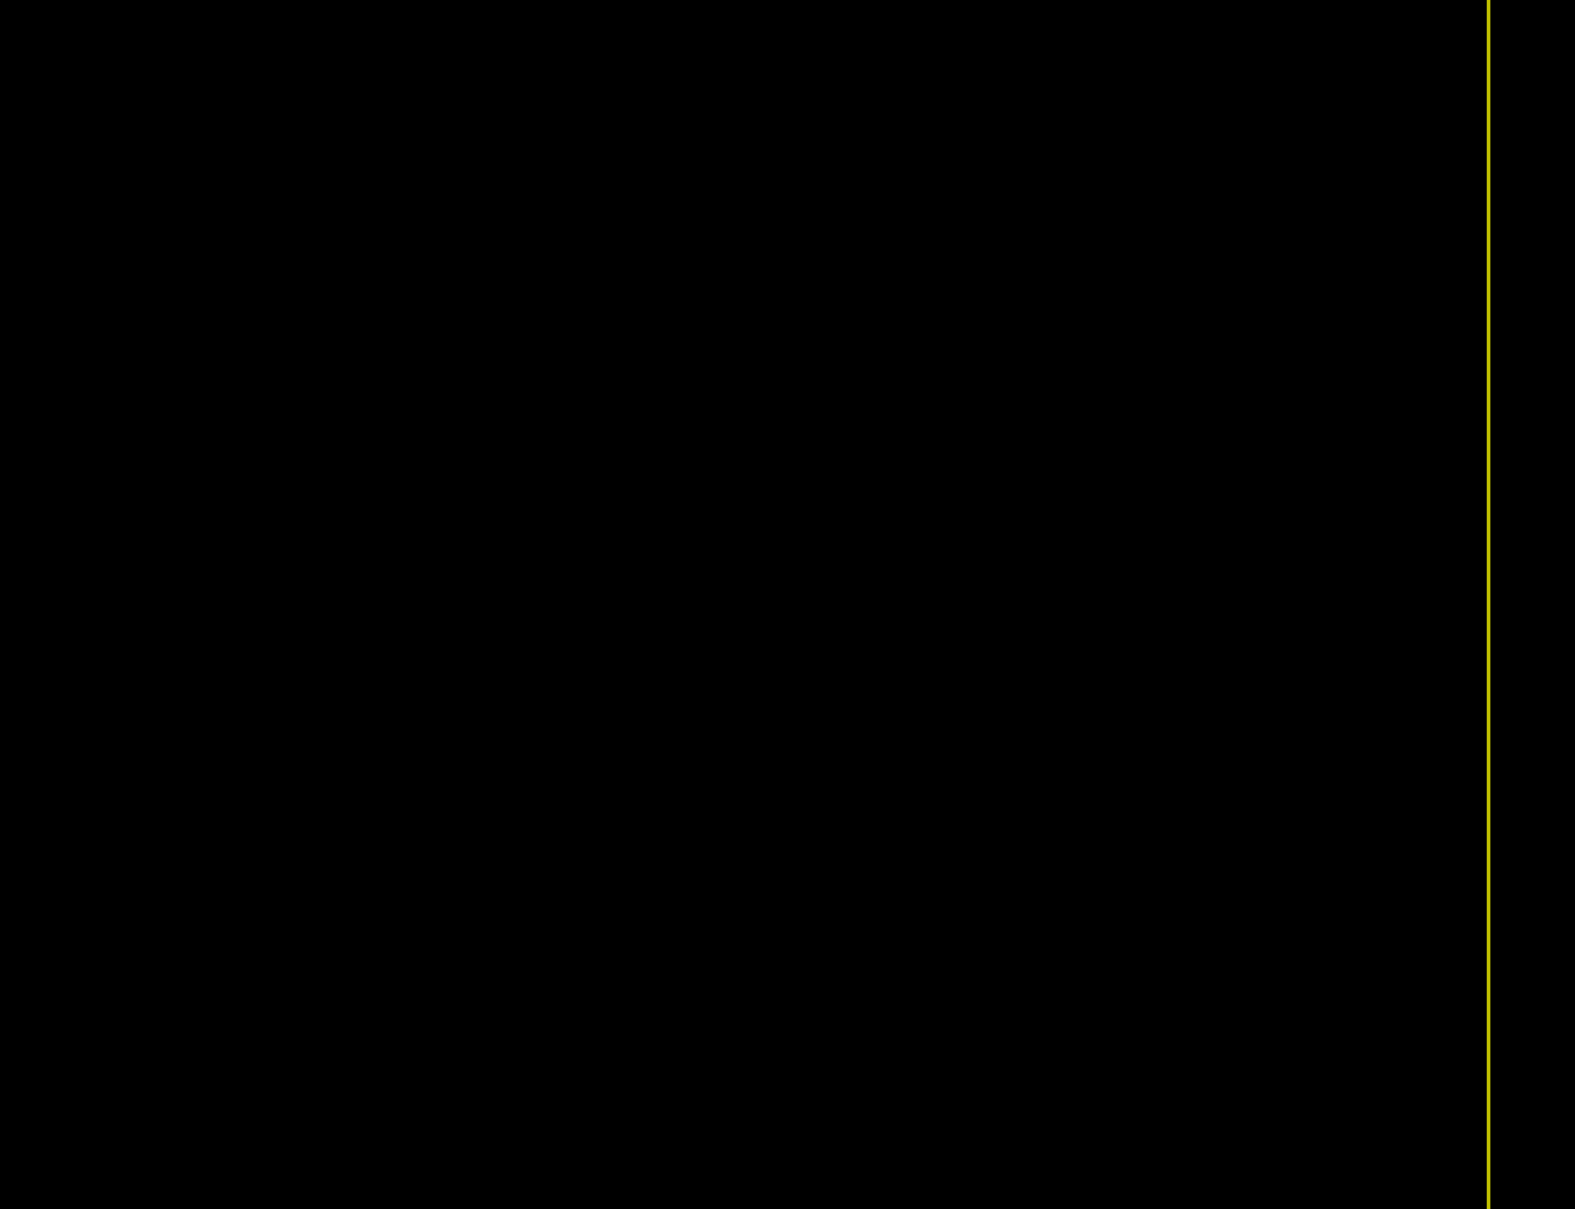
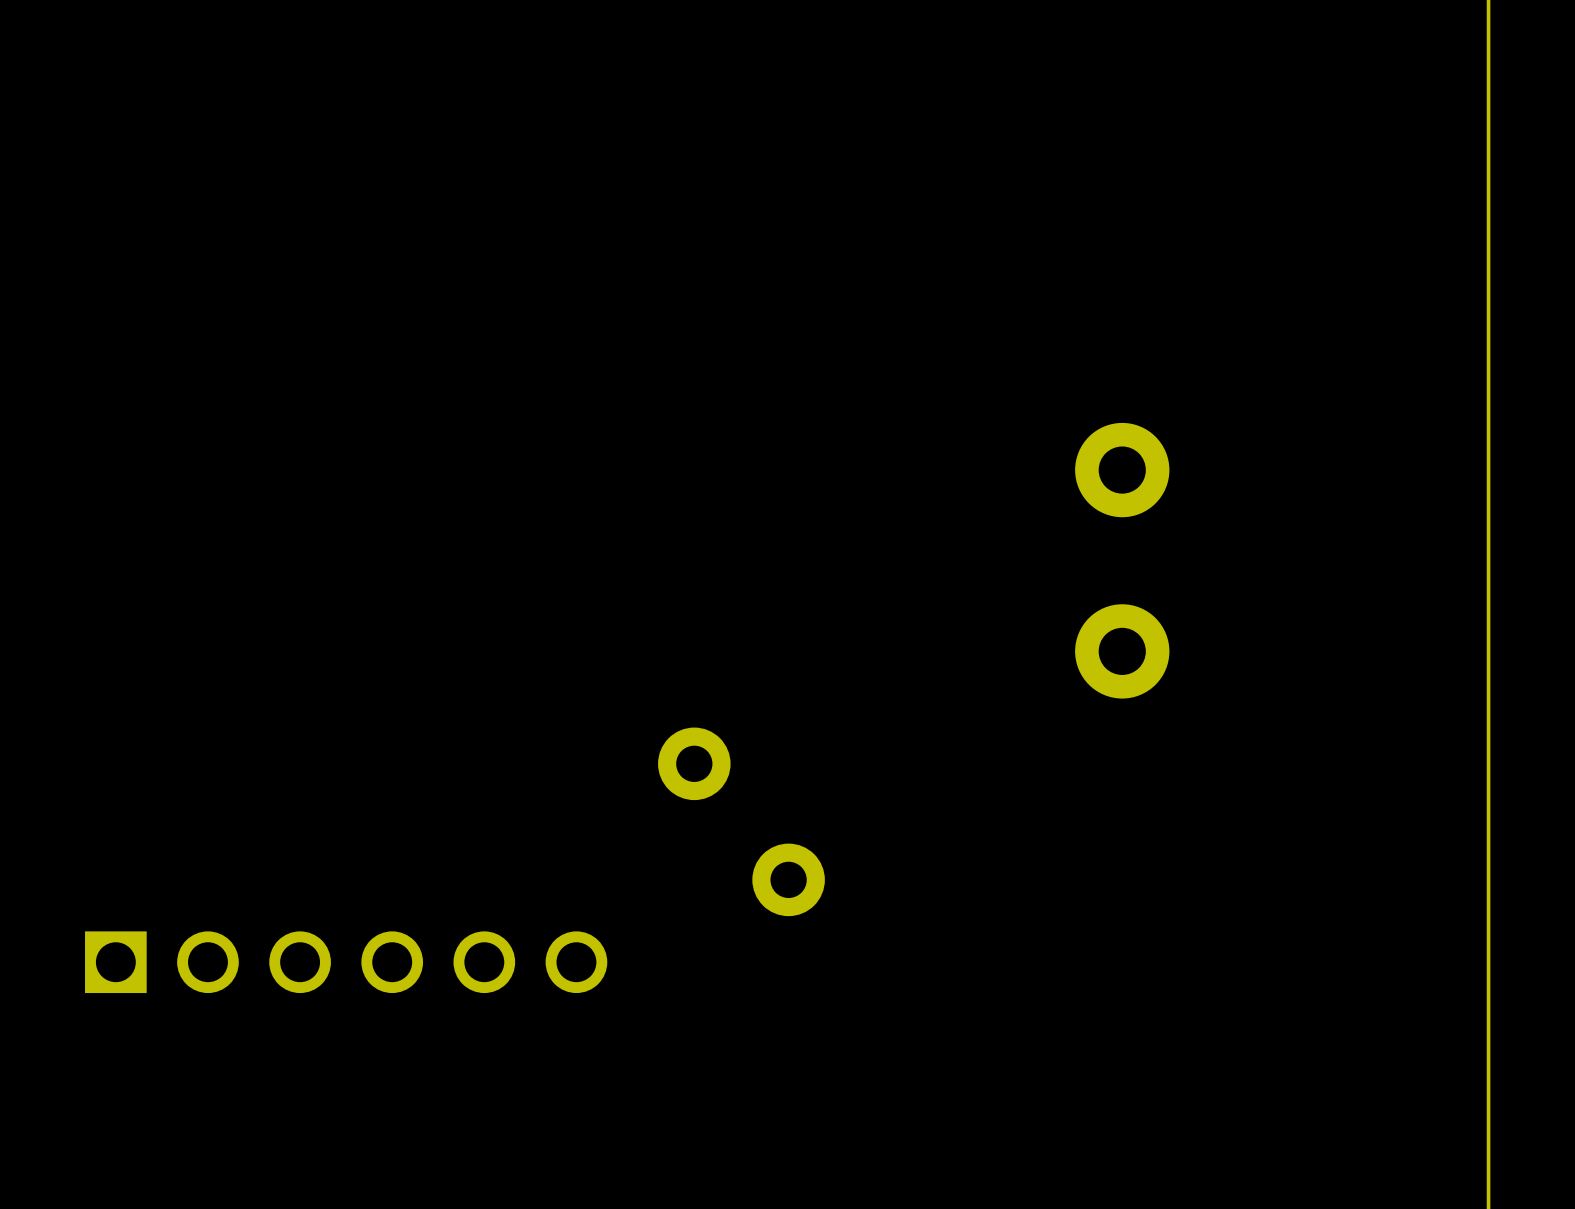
part: none -> (1122, 560)
part: none -> (694, 763)
part: none -> (788, 879)
part: none -> (346, 962)

